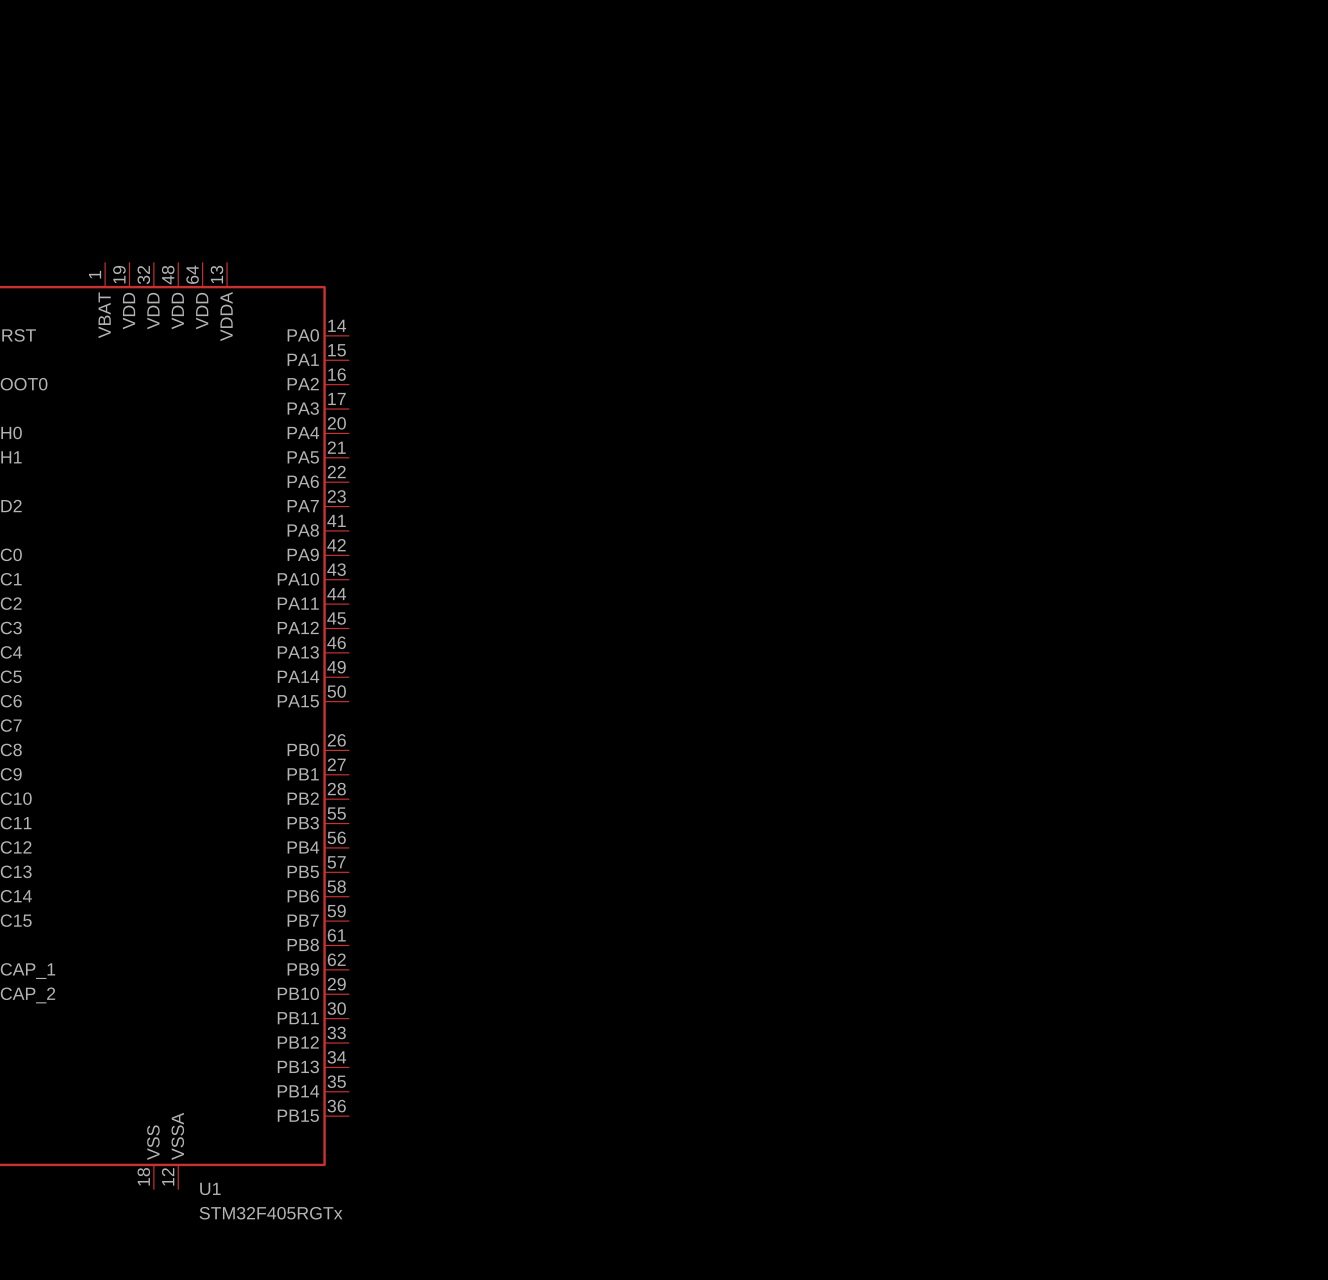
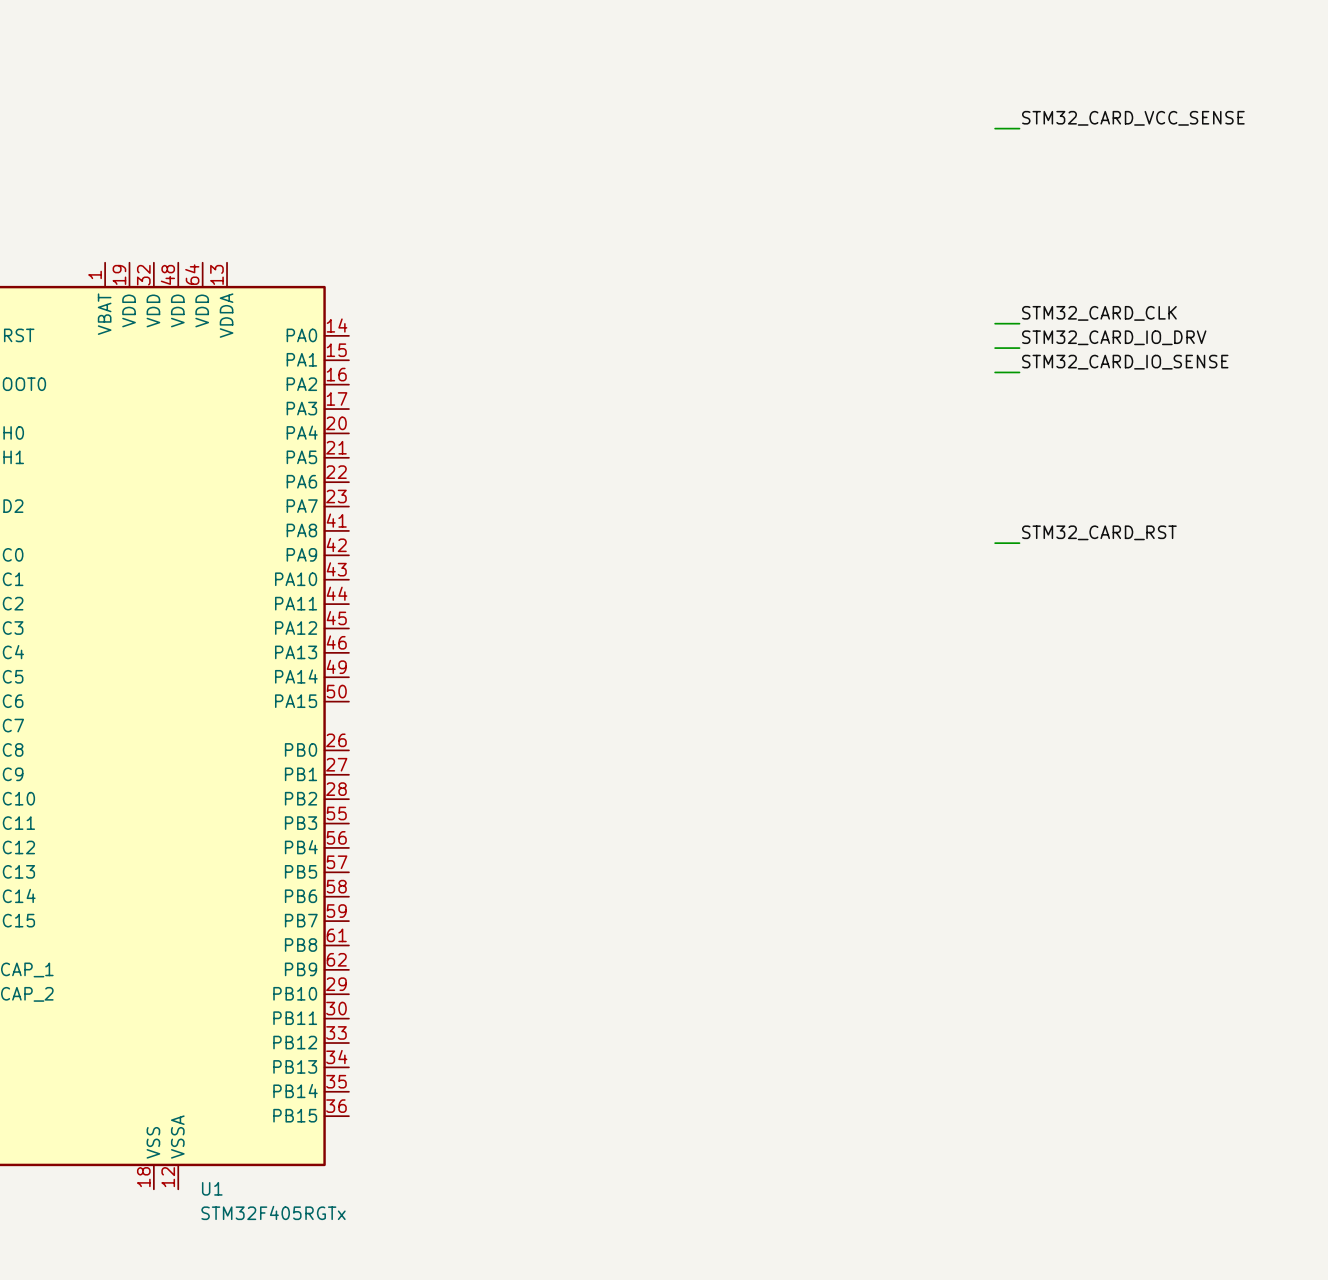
label: none -> STM32_CARD_VCC_SENSE (1133, 118)
wire: none -> (995, 128) (1019, 128)
label: none -> STM32_CARD_CLK (1099, 313)
wire: none -> (995, 323) (1019, 323)
label: none -> STM32_CARD_IO_DRV (1114, 337)
wire: none -> (995, 348) (1019, 348)
label: none -> STM32_CARD_IO_SENSE (1125, 362)
wire: none -> (995, 372) (1019, 372)
label: none -> STM32_CARD_RST (1099, 532)
wire: none -> (995, 543) (1019, 543)

